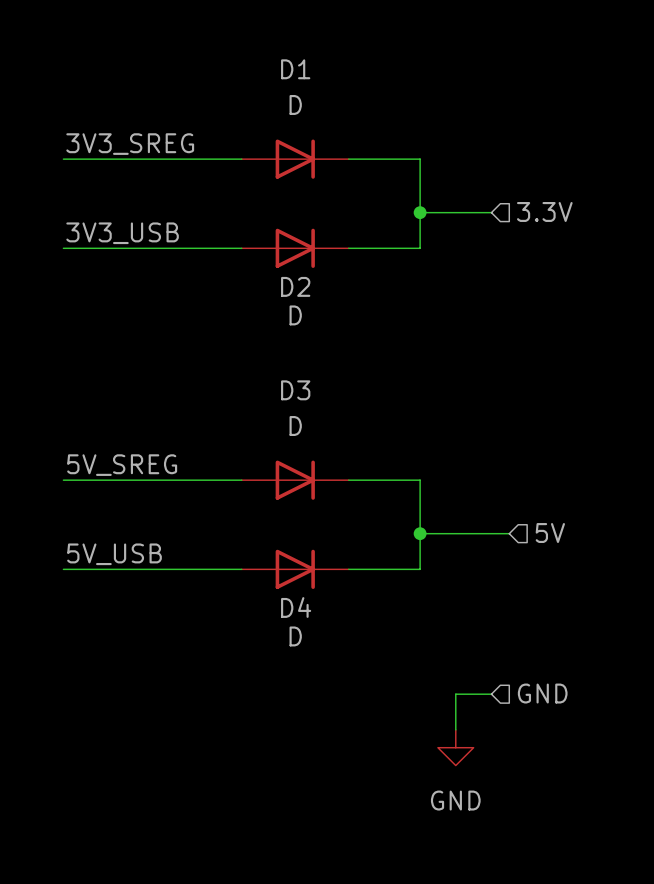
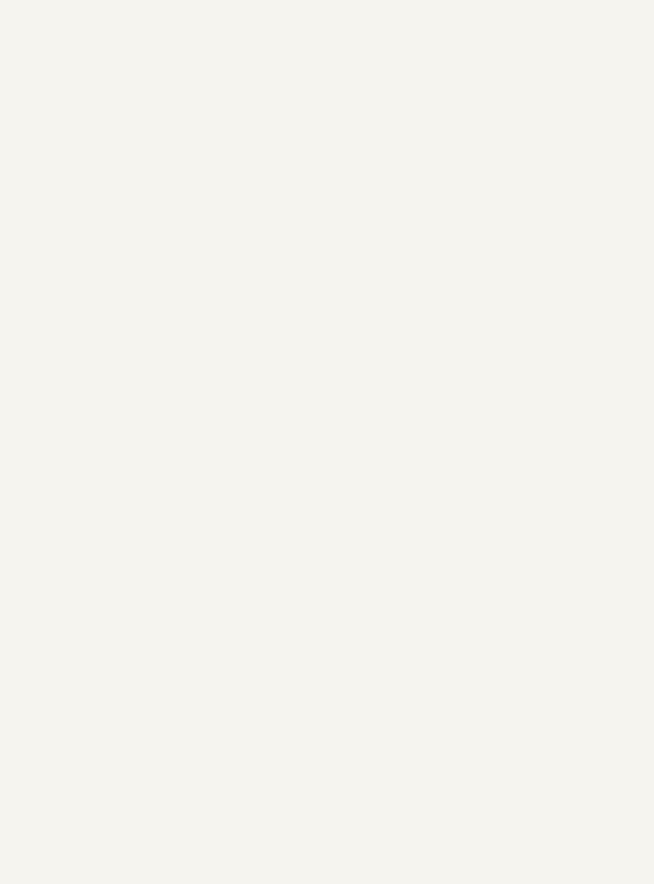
label: 3V3_SREG (130, 144) -> none
wire: (63, 159) (241, 159) -> none
D1: D (295, 159) -> none
wire: (348, 159) (420, 159) (420, 248) (348, 248) -> none
hierarchical label: 3.3V (544, 211) -> none
wire: (420, 212) (491, 212) -> none
junction: (420, 212) -> none
label: 3V3_USB (122, 233) -> none
wire: (63, 248) (241, 248) -> none
D2: D (295, 248) -> none
label: 5V_SREG (122, 465) -> none
wire: (63, 480) (241, 480) -> none
D3: D (295, 480) -> none
wire: (348, 480) (420, 480) (420, 569) (348, 569) -> none
wire: (420, 533) (509, 533) -> none
junction: (420, 533) -> none
hierarchical label: 5V (550, 533) -> none
label: 5V_USB (114, 554) -> none
wire: (63, 569) (241, 569) -> none
D4: D (295, 569) -> none
hierarchical label: GND (542, 693) -> none
wire: (491, 694) (455, 694) (455, 729) -> none
power symbol: GND (455, 747) -> none

